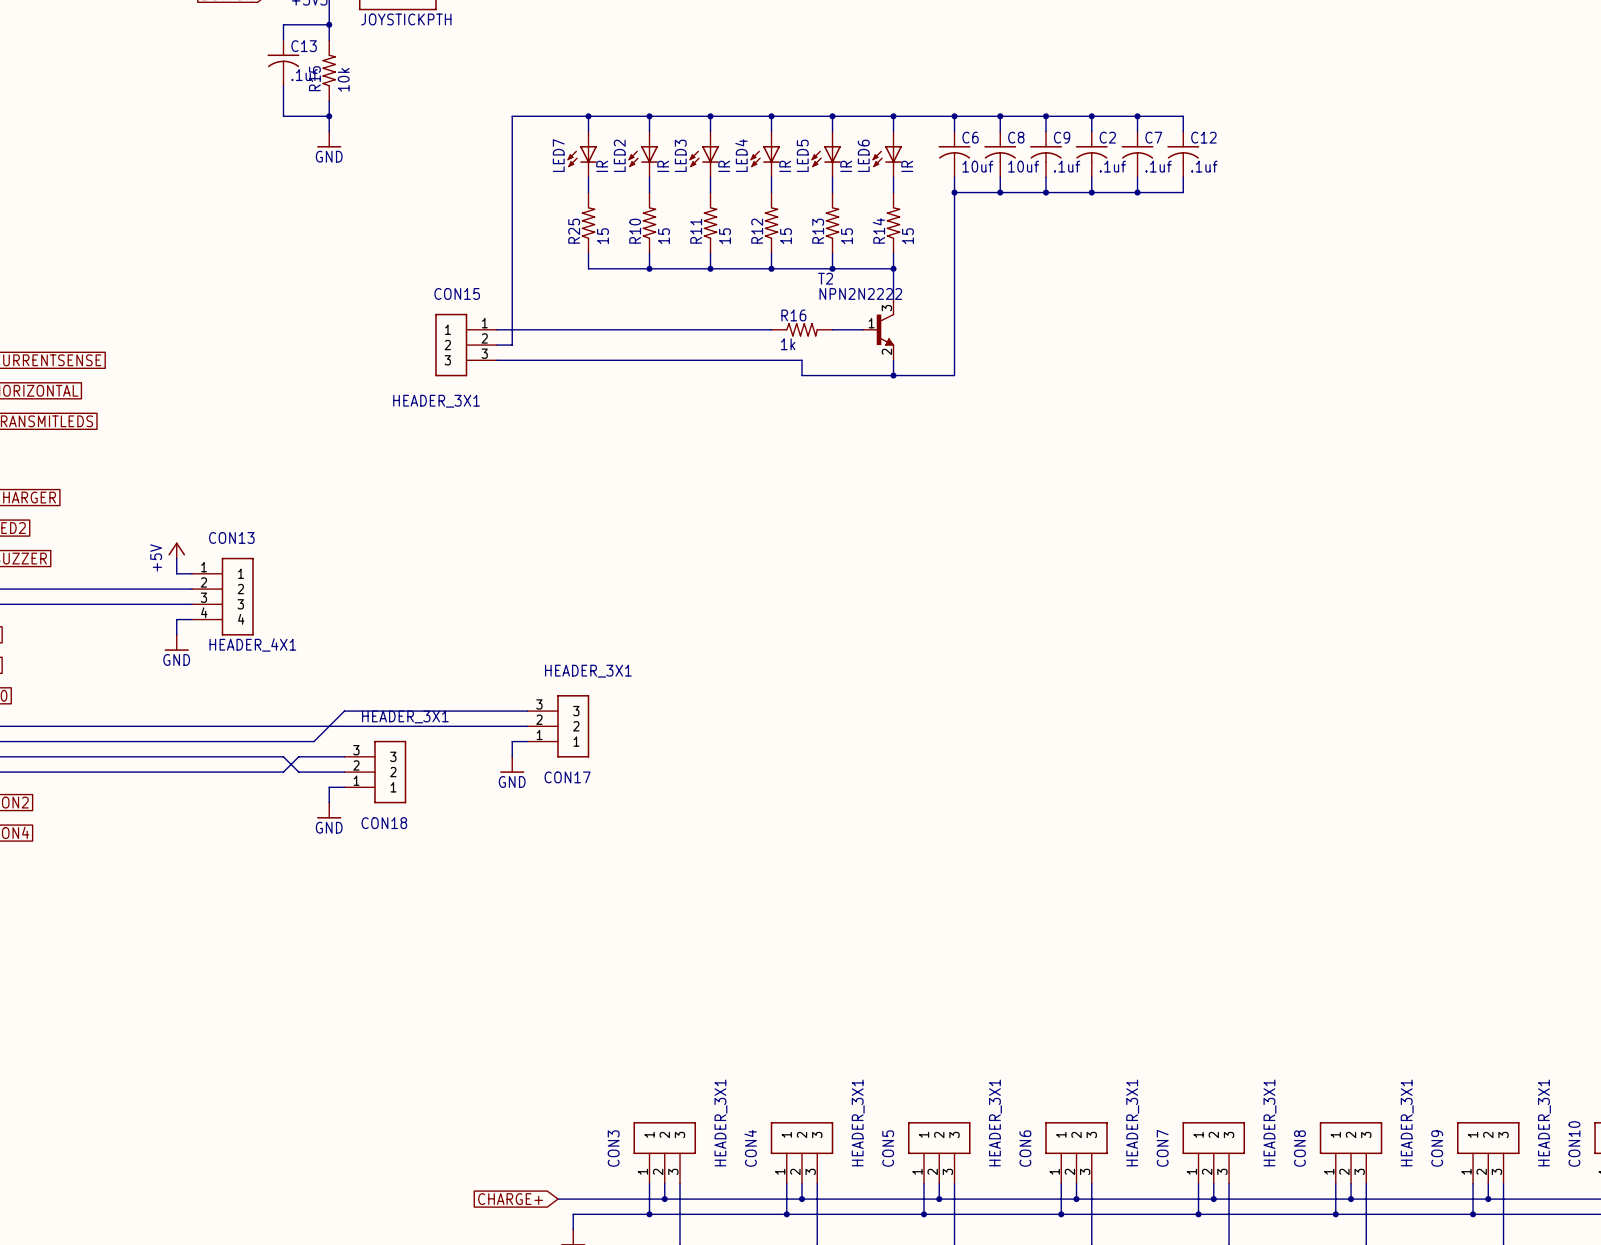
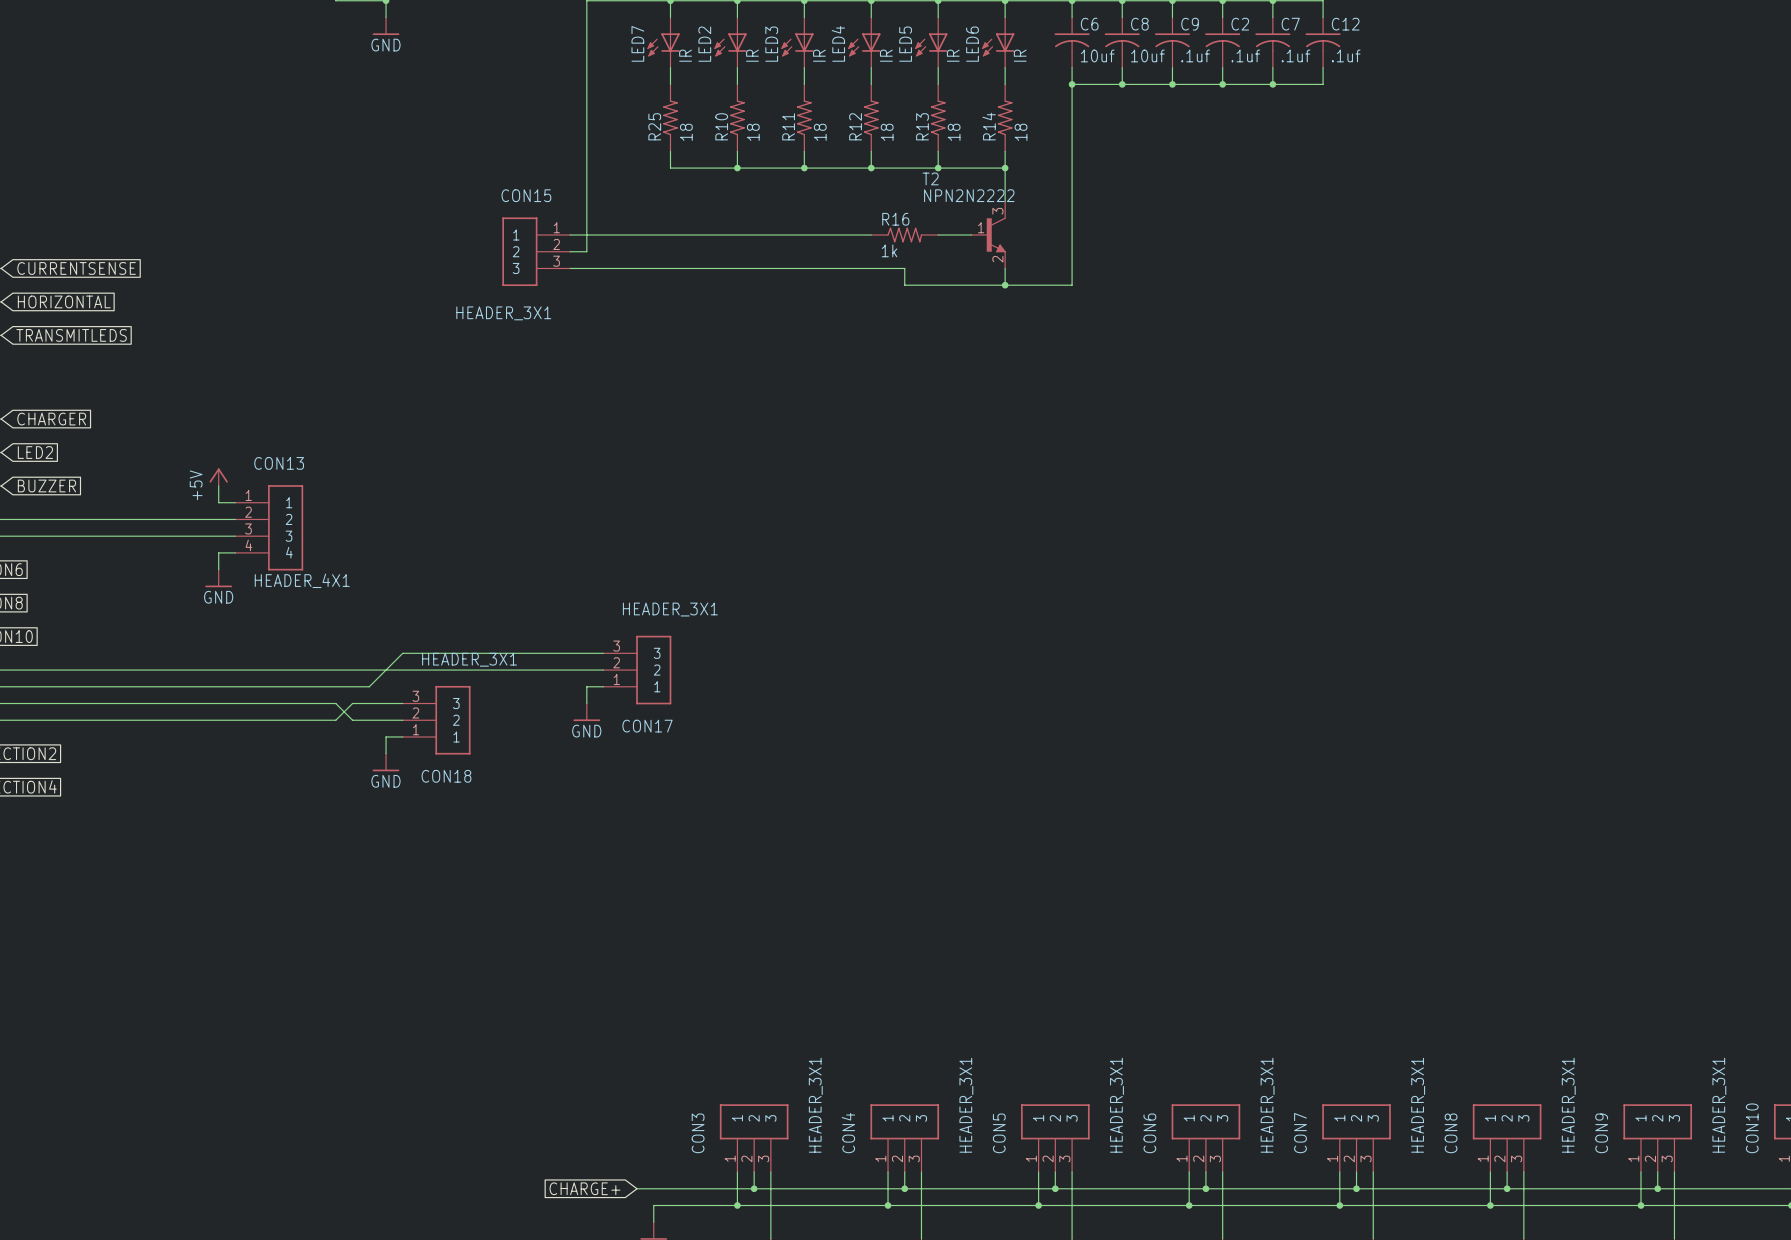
R25 value: 15 (602, 236) -> 18 (686, 132)
R10 value: 15 (663, 236) -> 18 (753, 132)
R11 value: 15 (724, 236) -> 18 (820, 132)
R12 value: 15 (785, 236) -> 18 (887, 132)
R13 value: 15 (846, 236) -> 18 (954, 132)
R14 value: 15 (908, 236) -> 18 (1021, 132)

